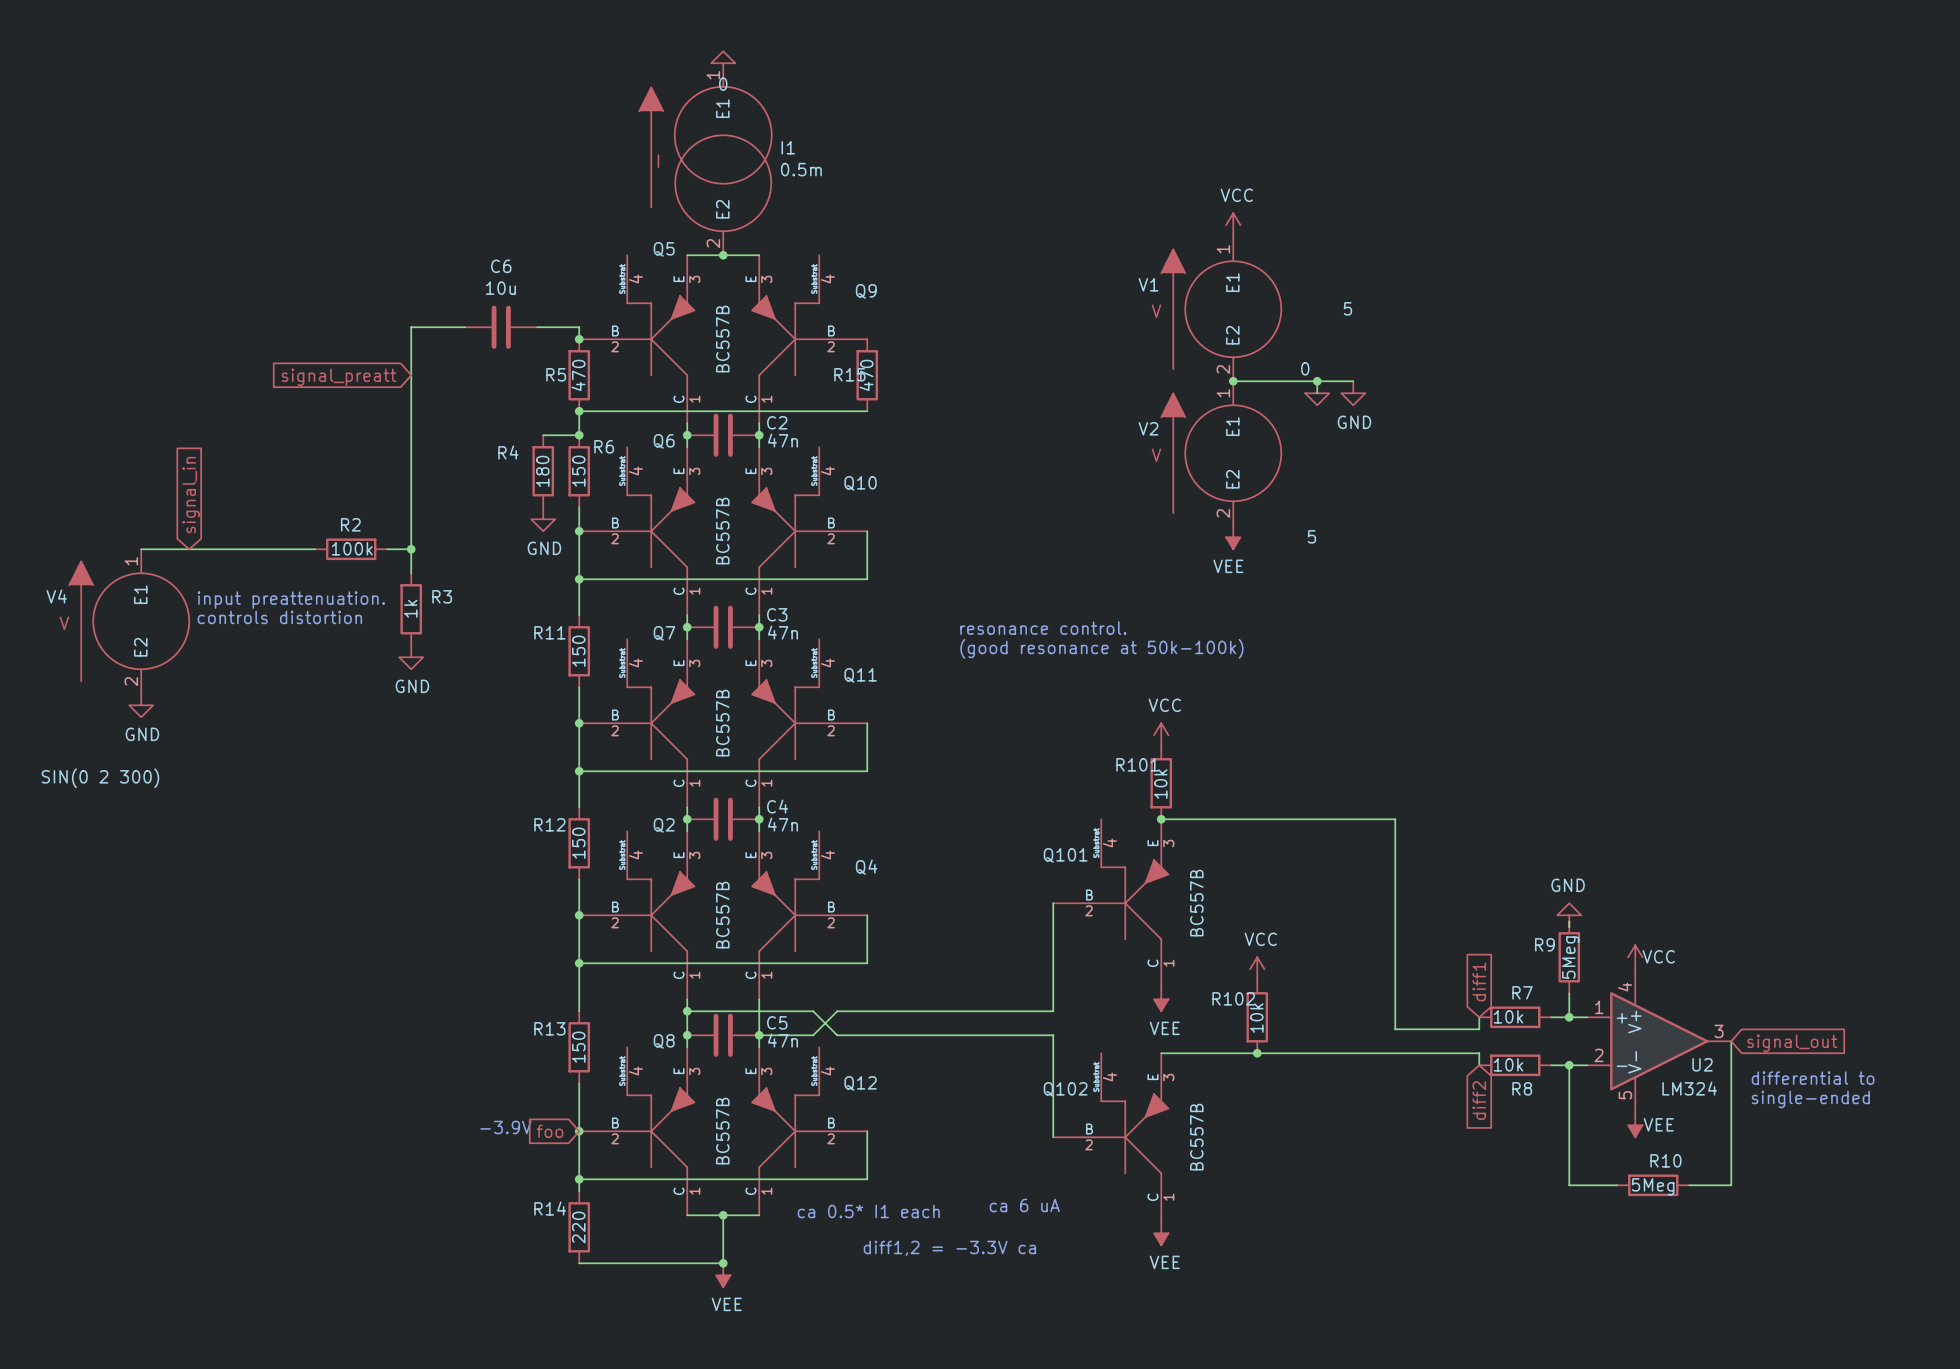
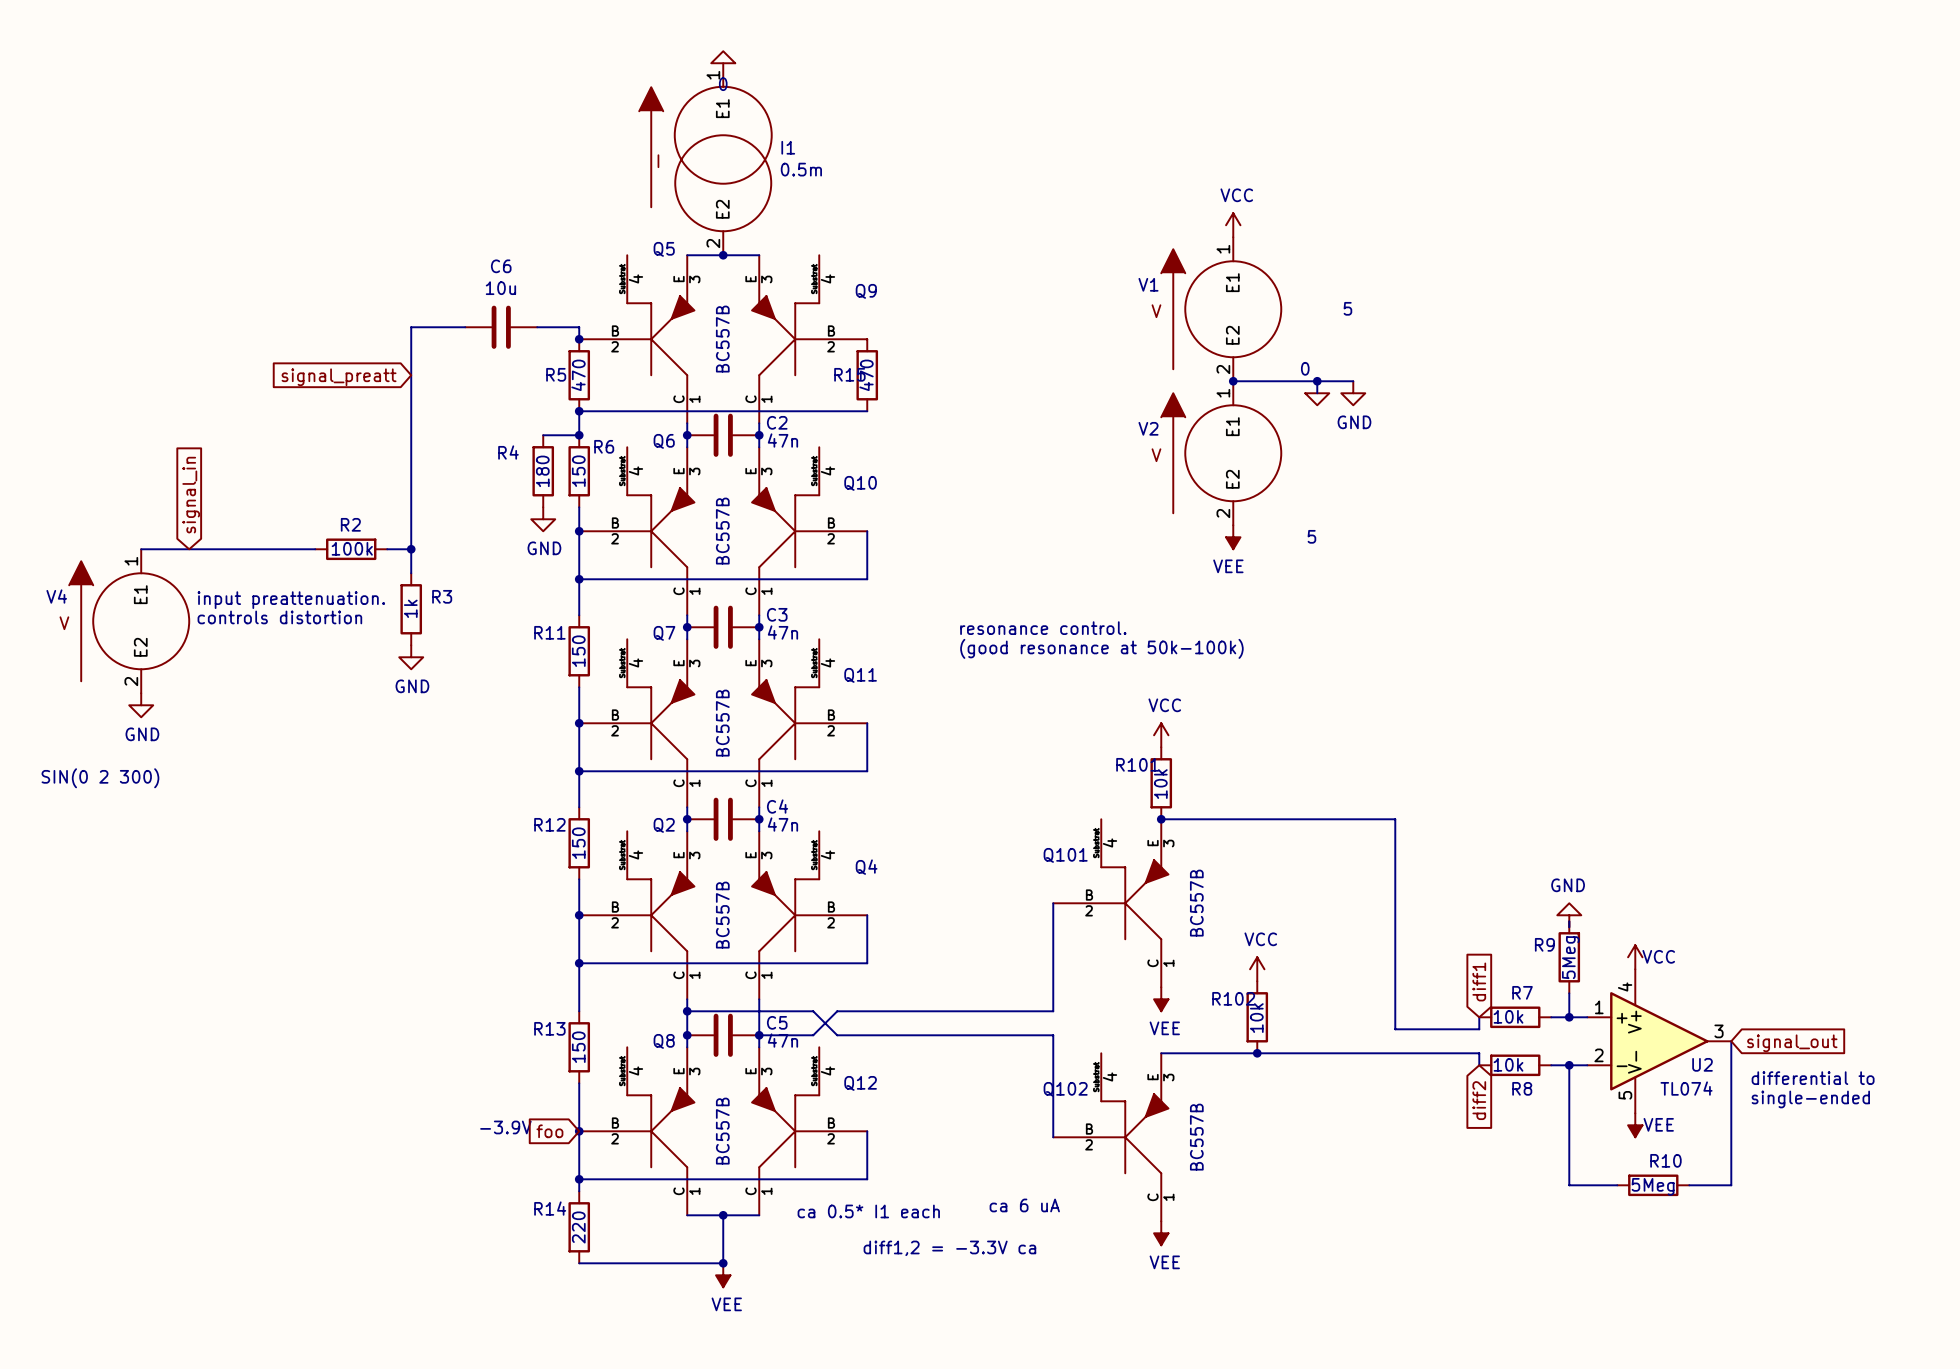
U2 value: LM324 (1689, 1088) -> TL074 (1686, 1088)

